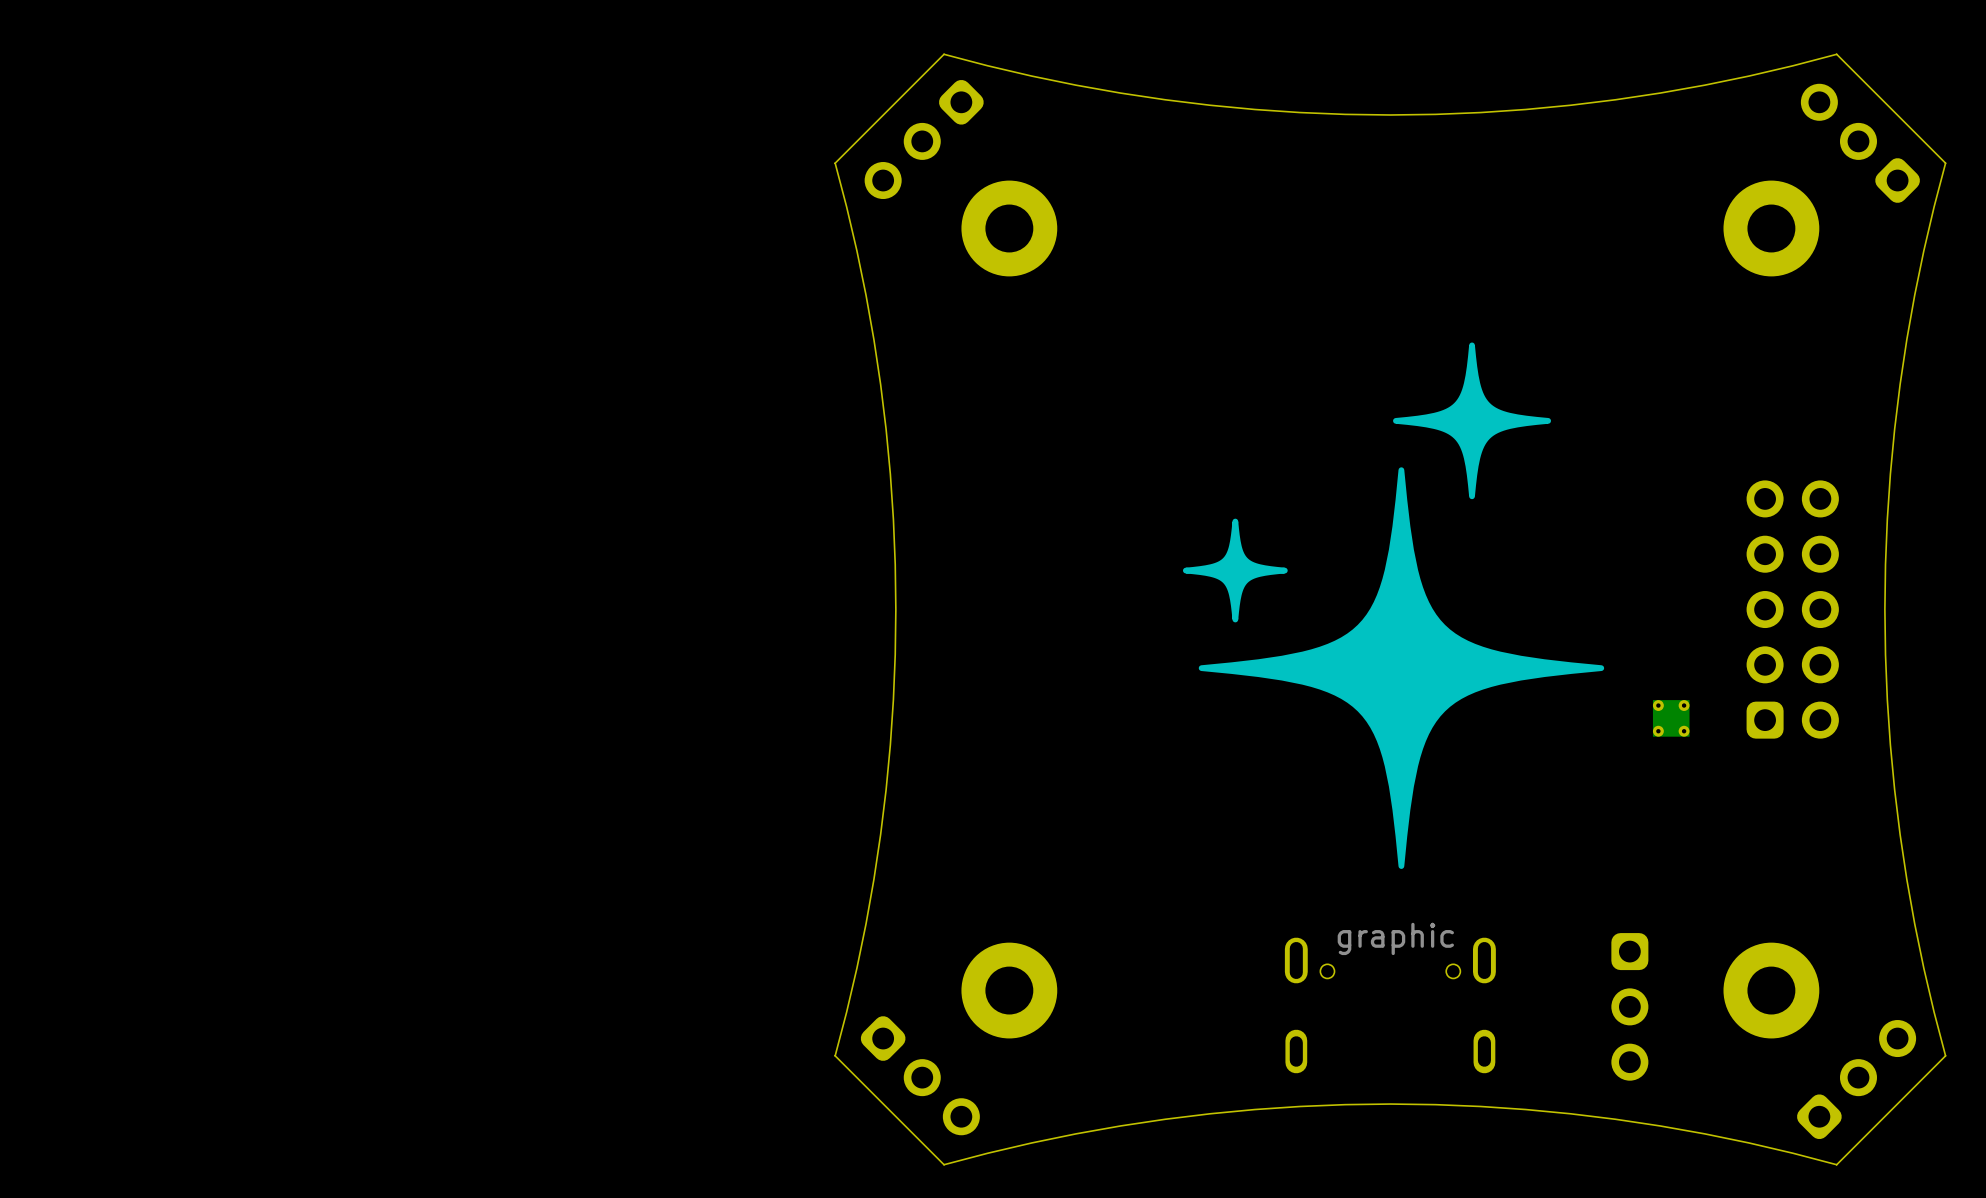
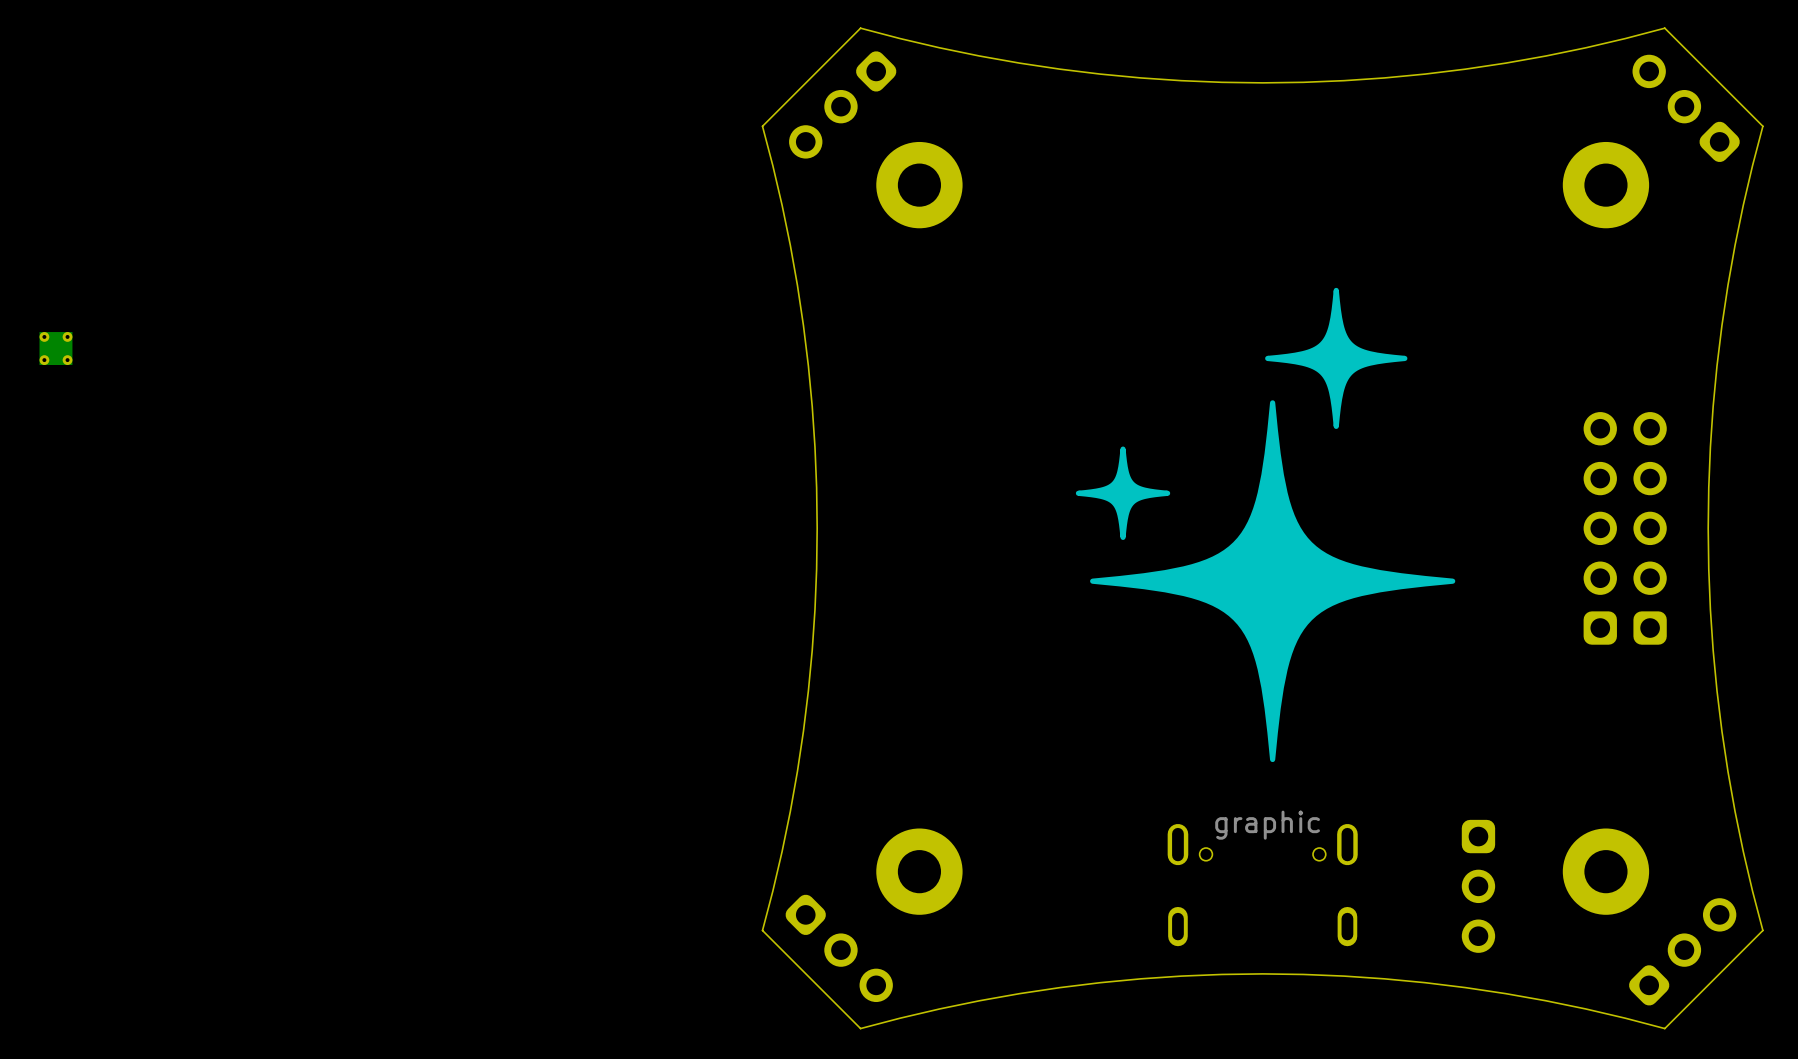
part: none -> (55, 348)
part footprint: [1746, 480, 1839, 739] -> [1583, 412, 1667, 645]
part: (1671, 718) -> none

